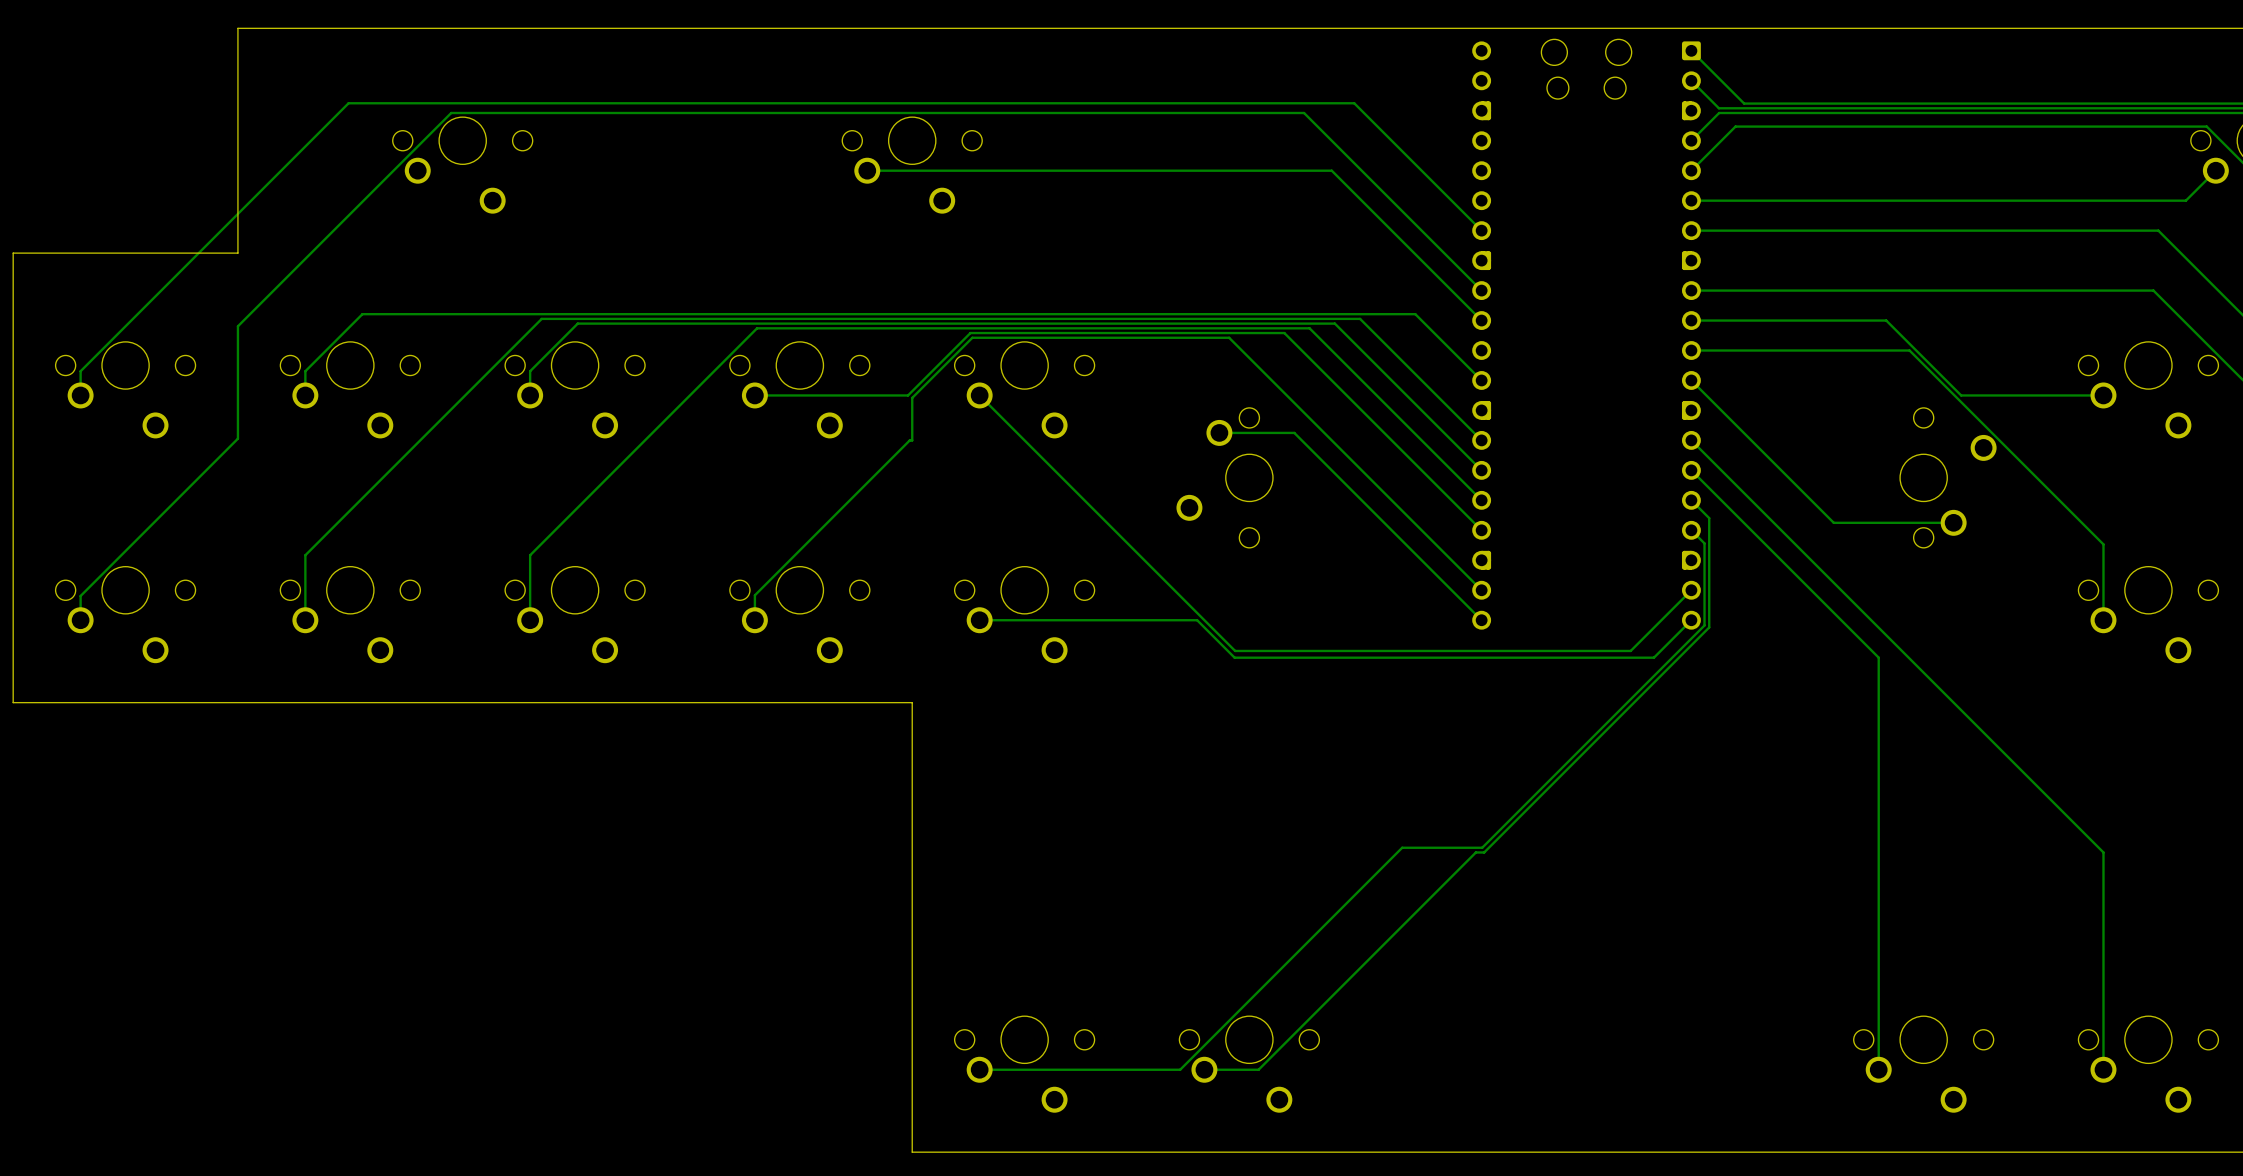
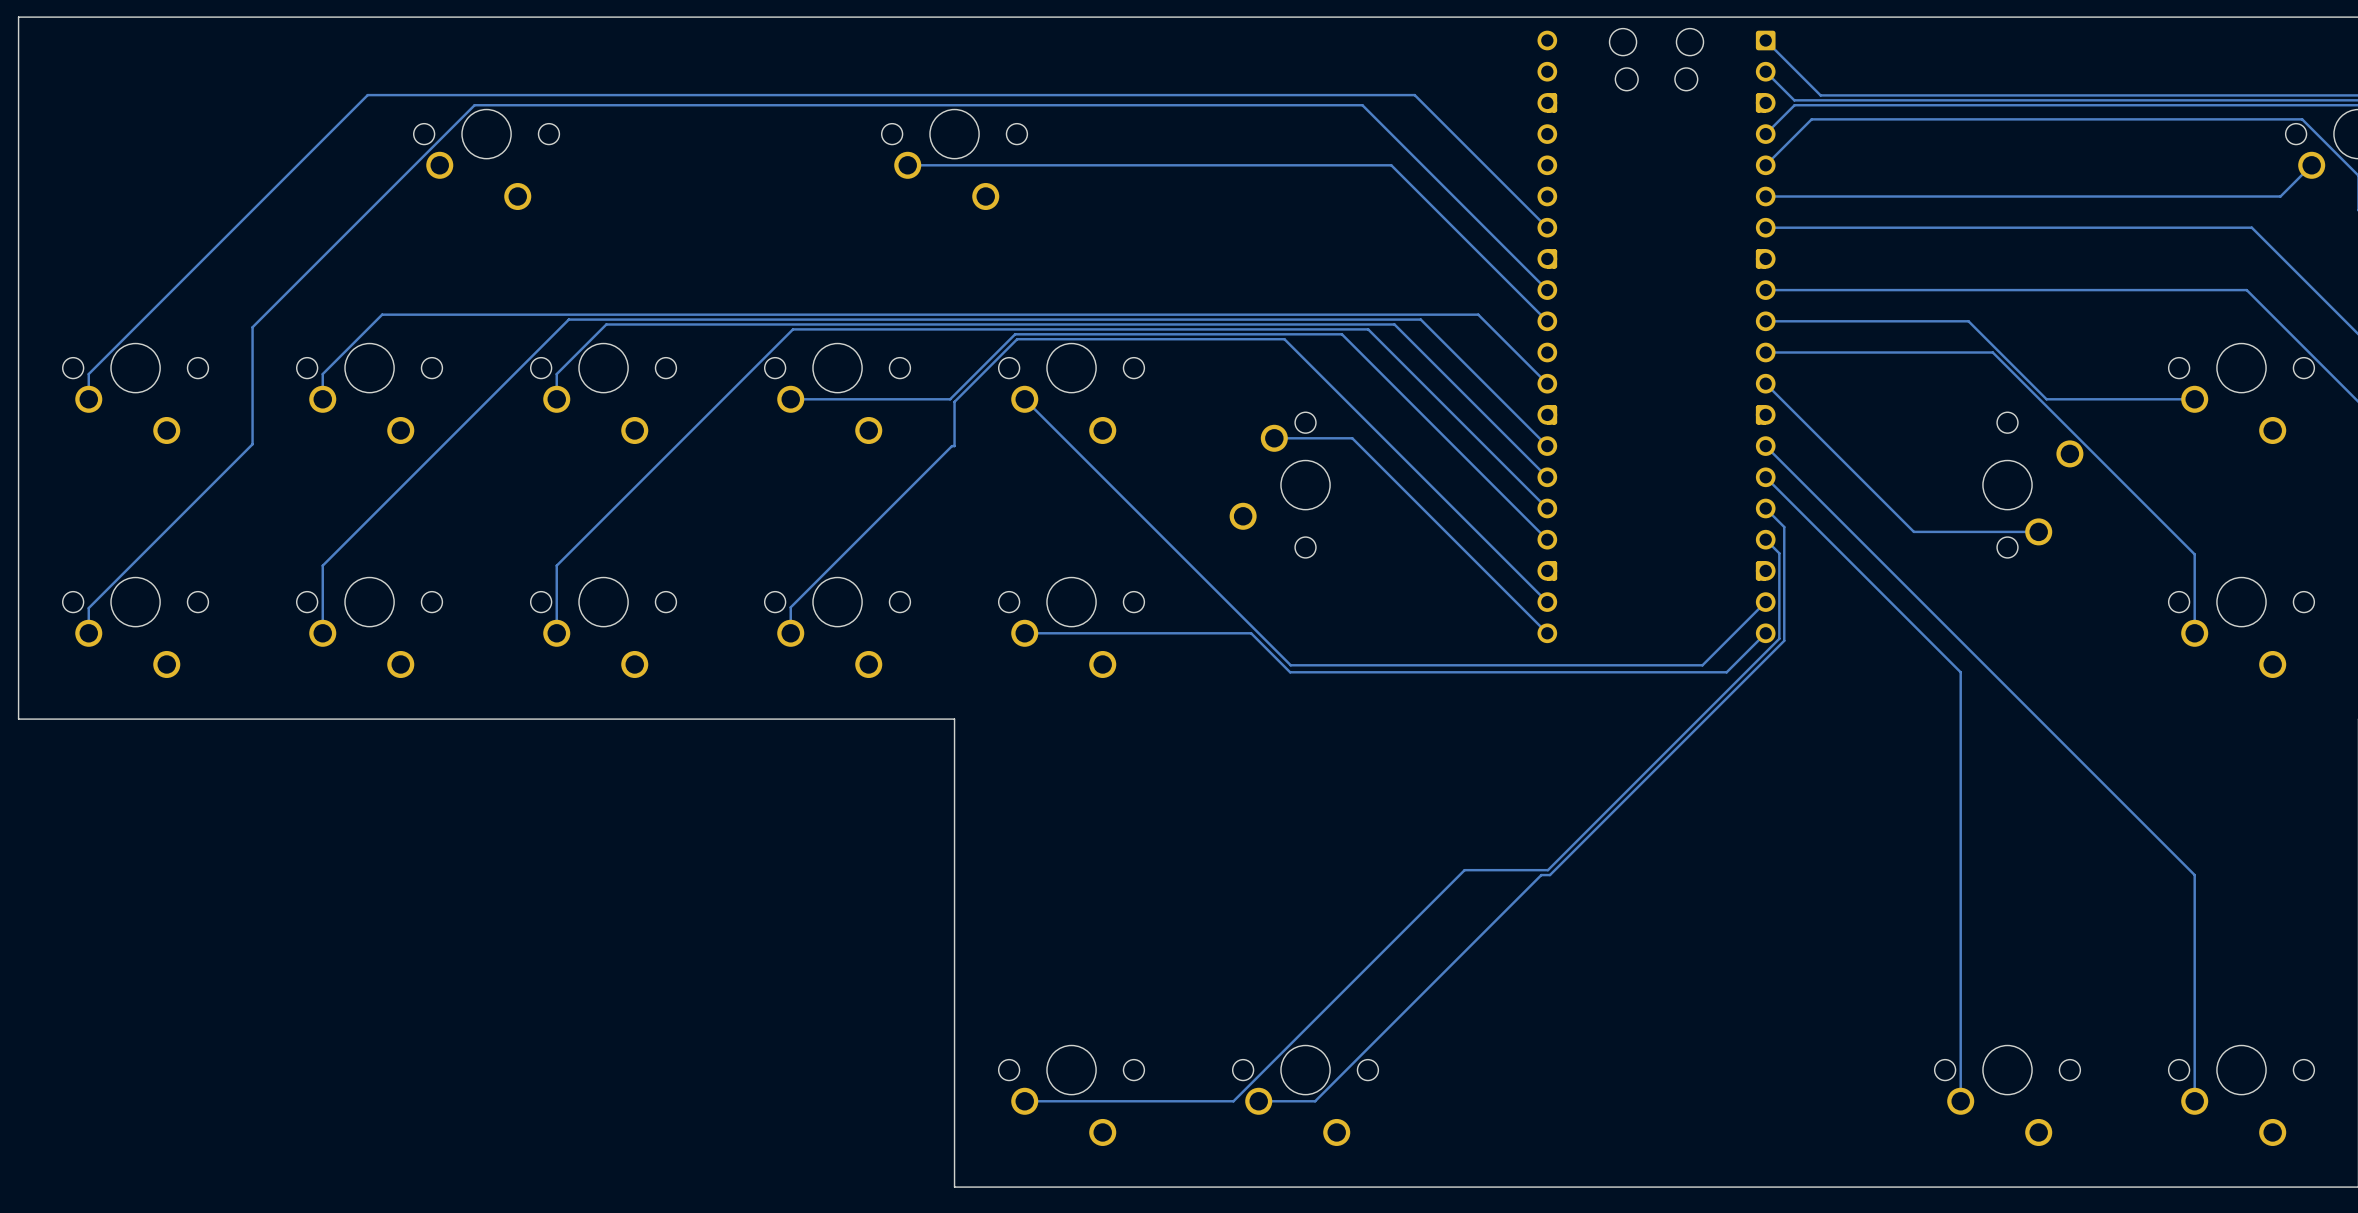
board edge: (237, 28) (237, 253) (13, 253) -> (252, 17) (18, 17) (18, 251)

